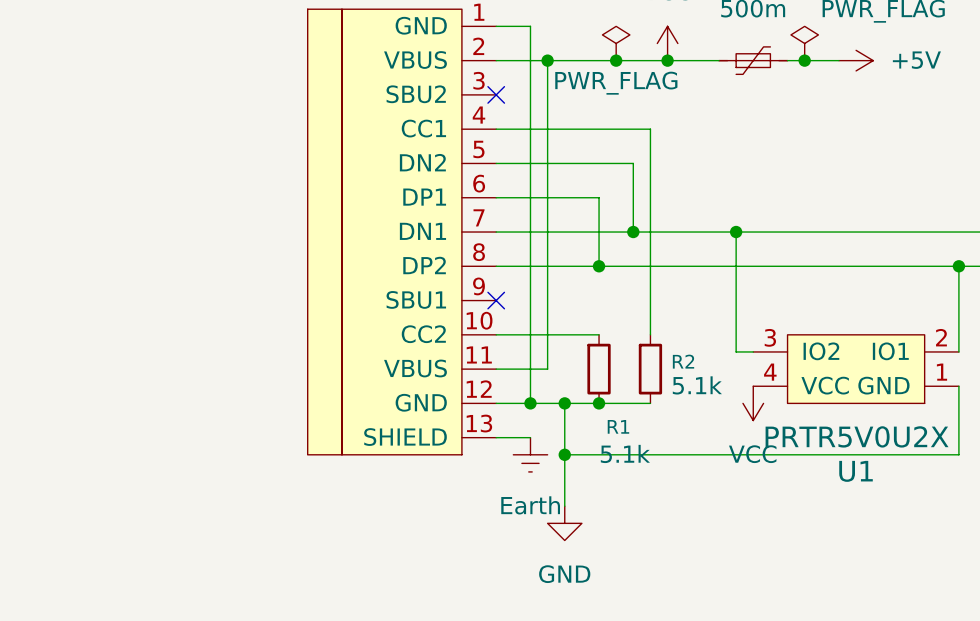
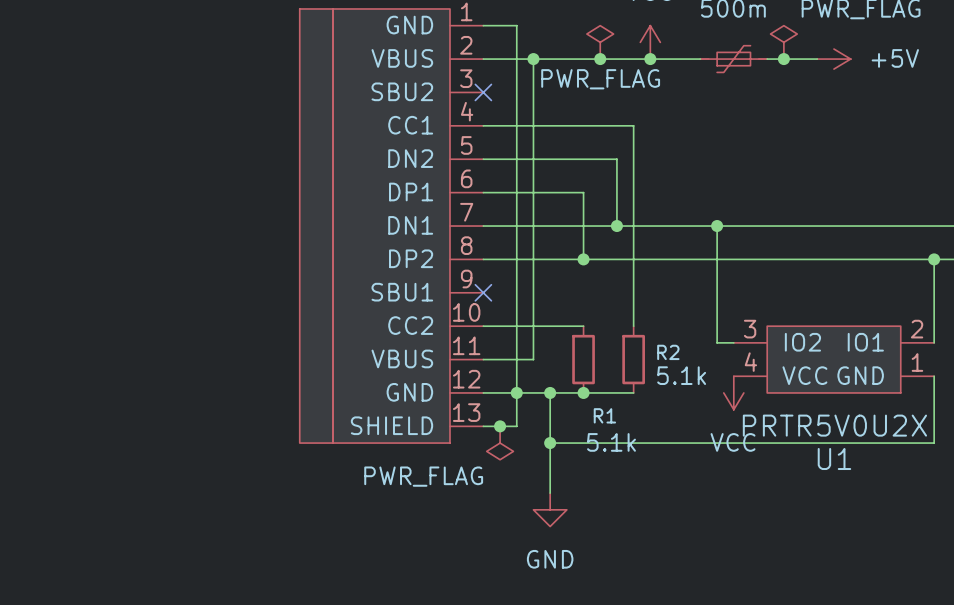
wire: none -> (516, 392) (516, 426)
junction: none -> (500, 426)
power symbol: none -> PWR_FLAG (500, 443)
power symbol: Earth (530, 454) -> none

